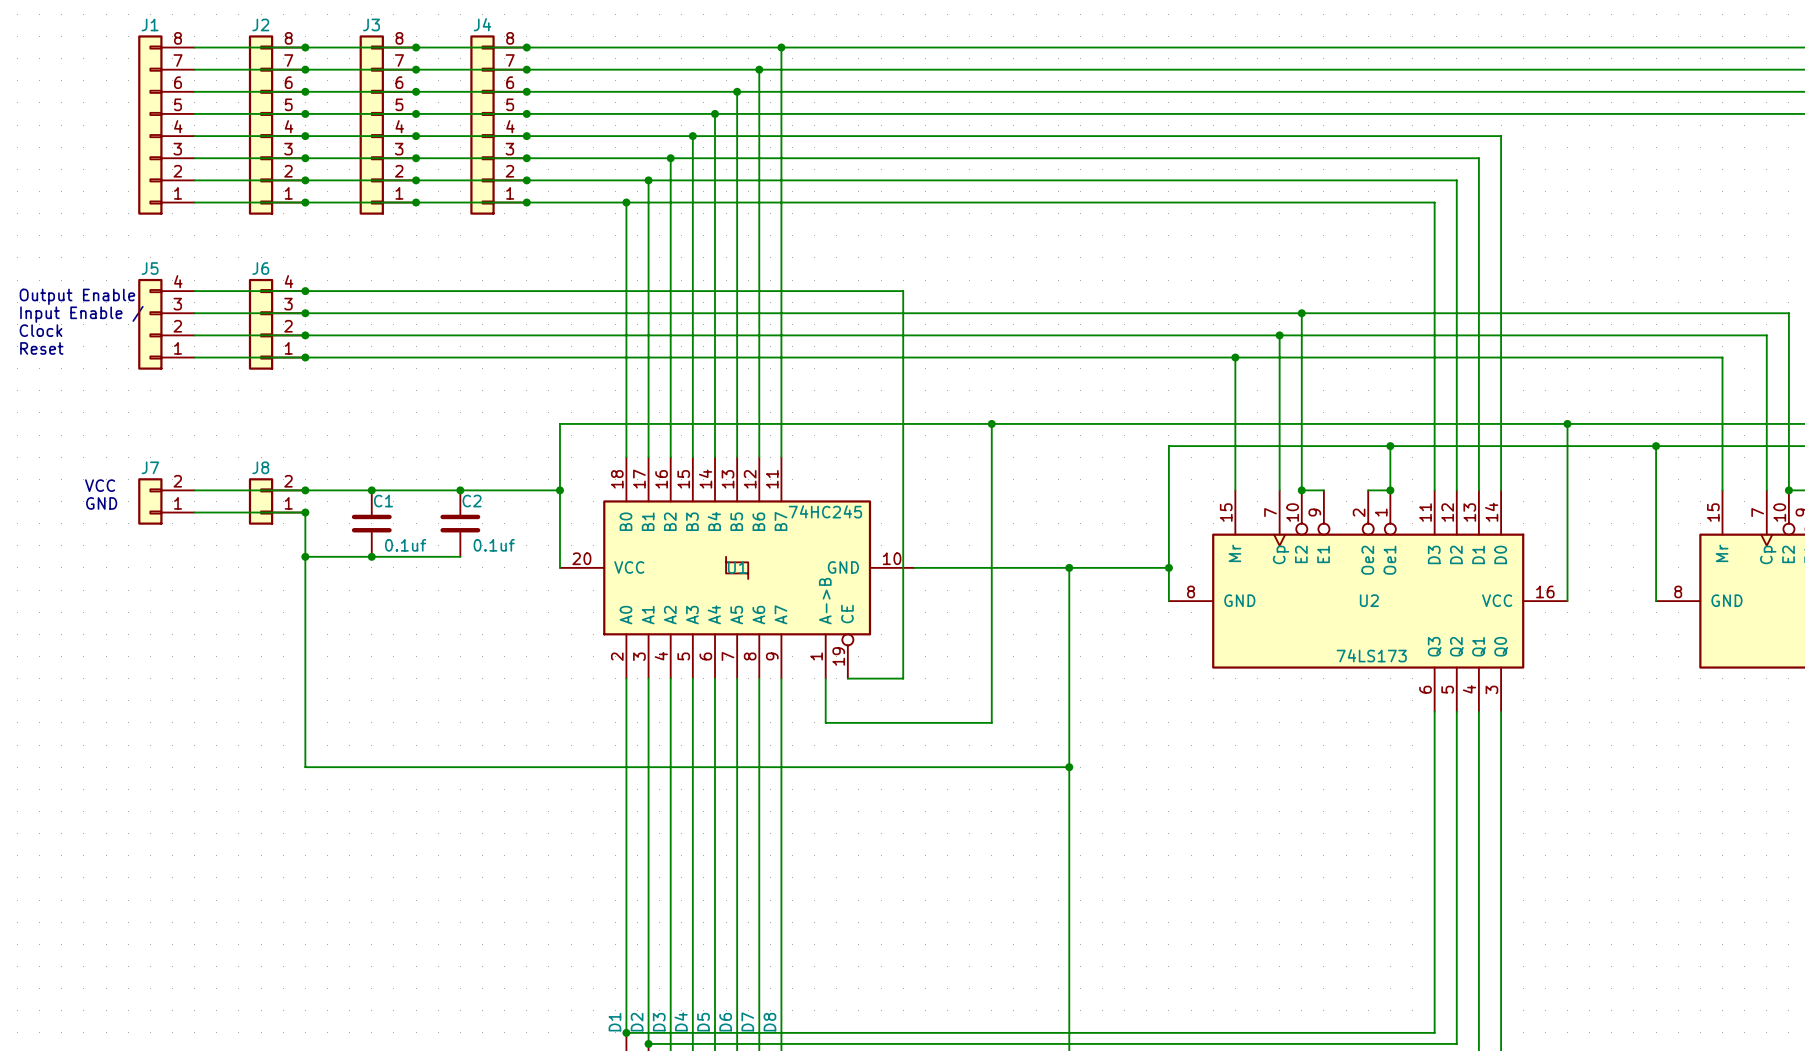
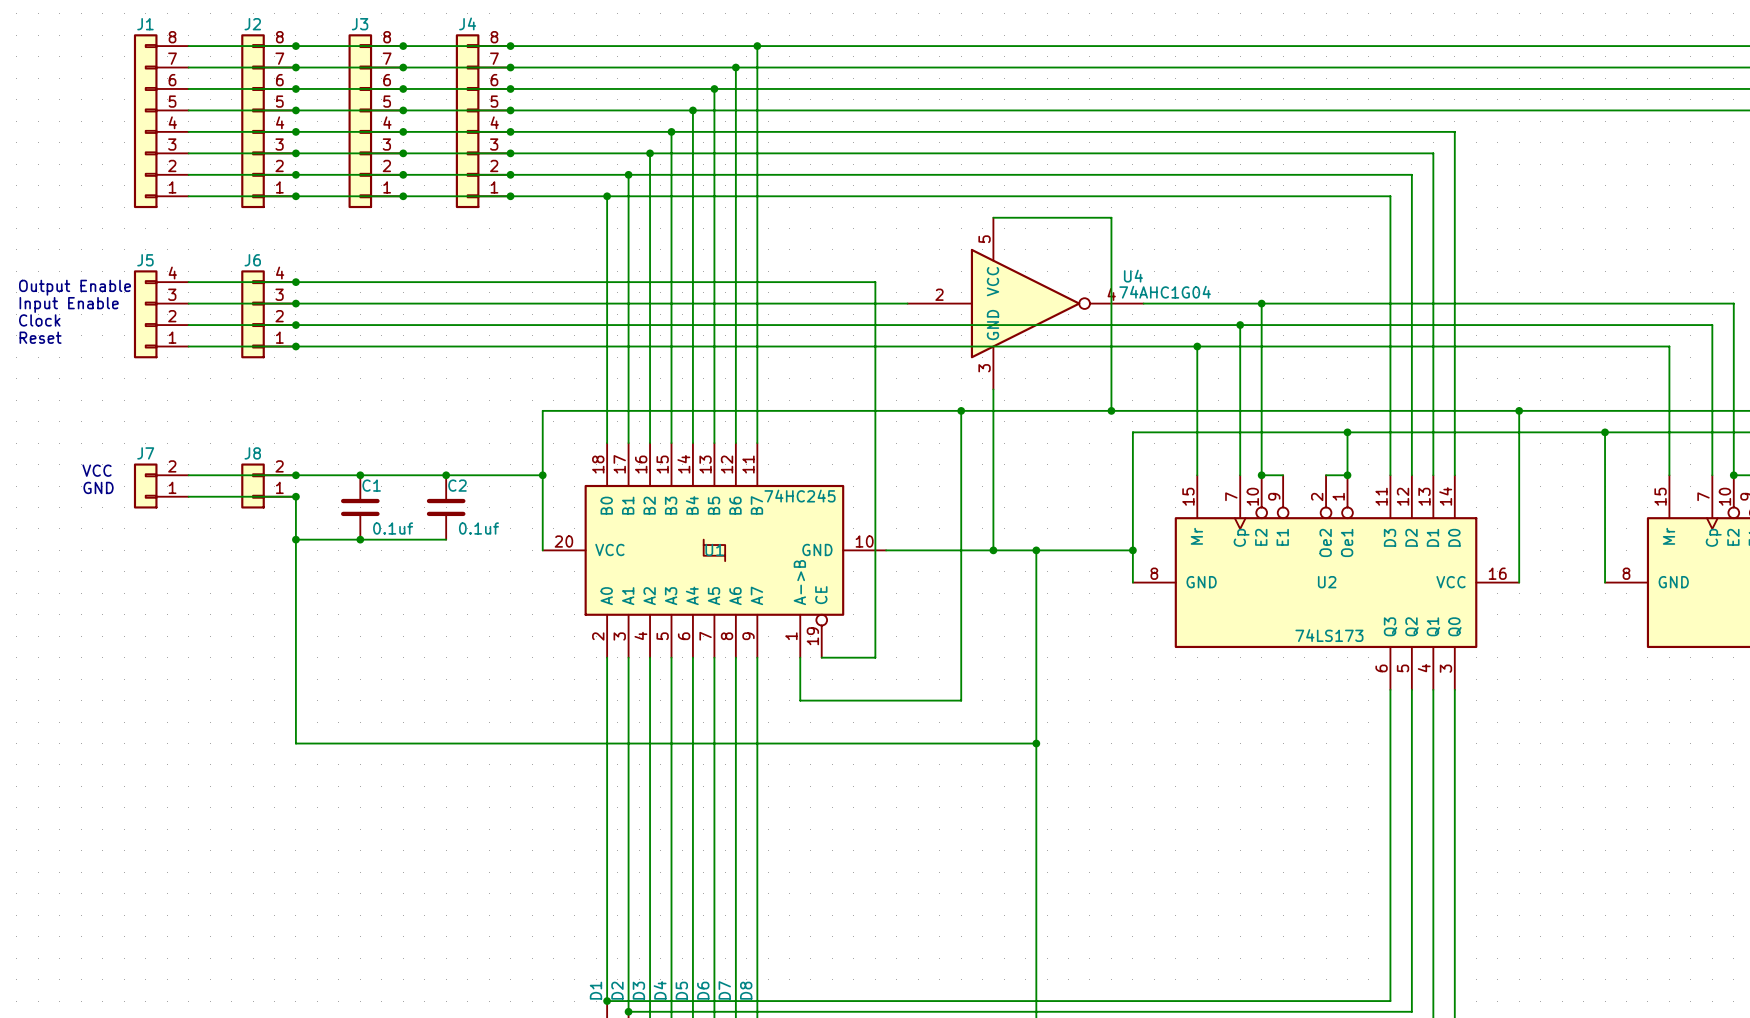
wire: none -> (993, 217) (1111, 217) (1111, 410)
U4: none -> 74AHC1G04 (1025, 303)
text: Input Enable / (81, 314) -> Input Enable (69, 304)
wire: none -> (993, 389) (993, 550)
junction: none -> (1111, 410)
junction: none -> (993, 550)

